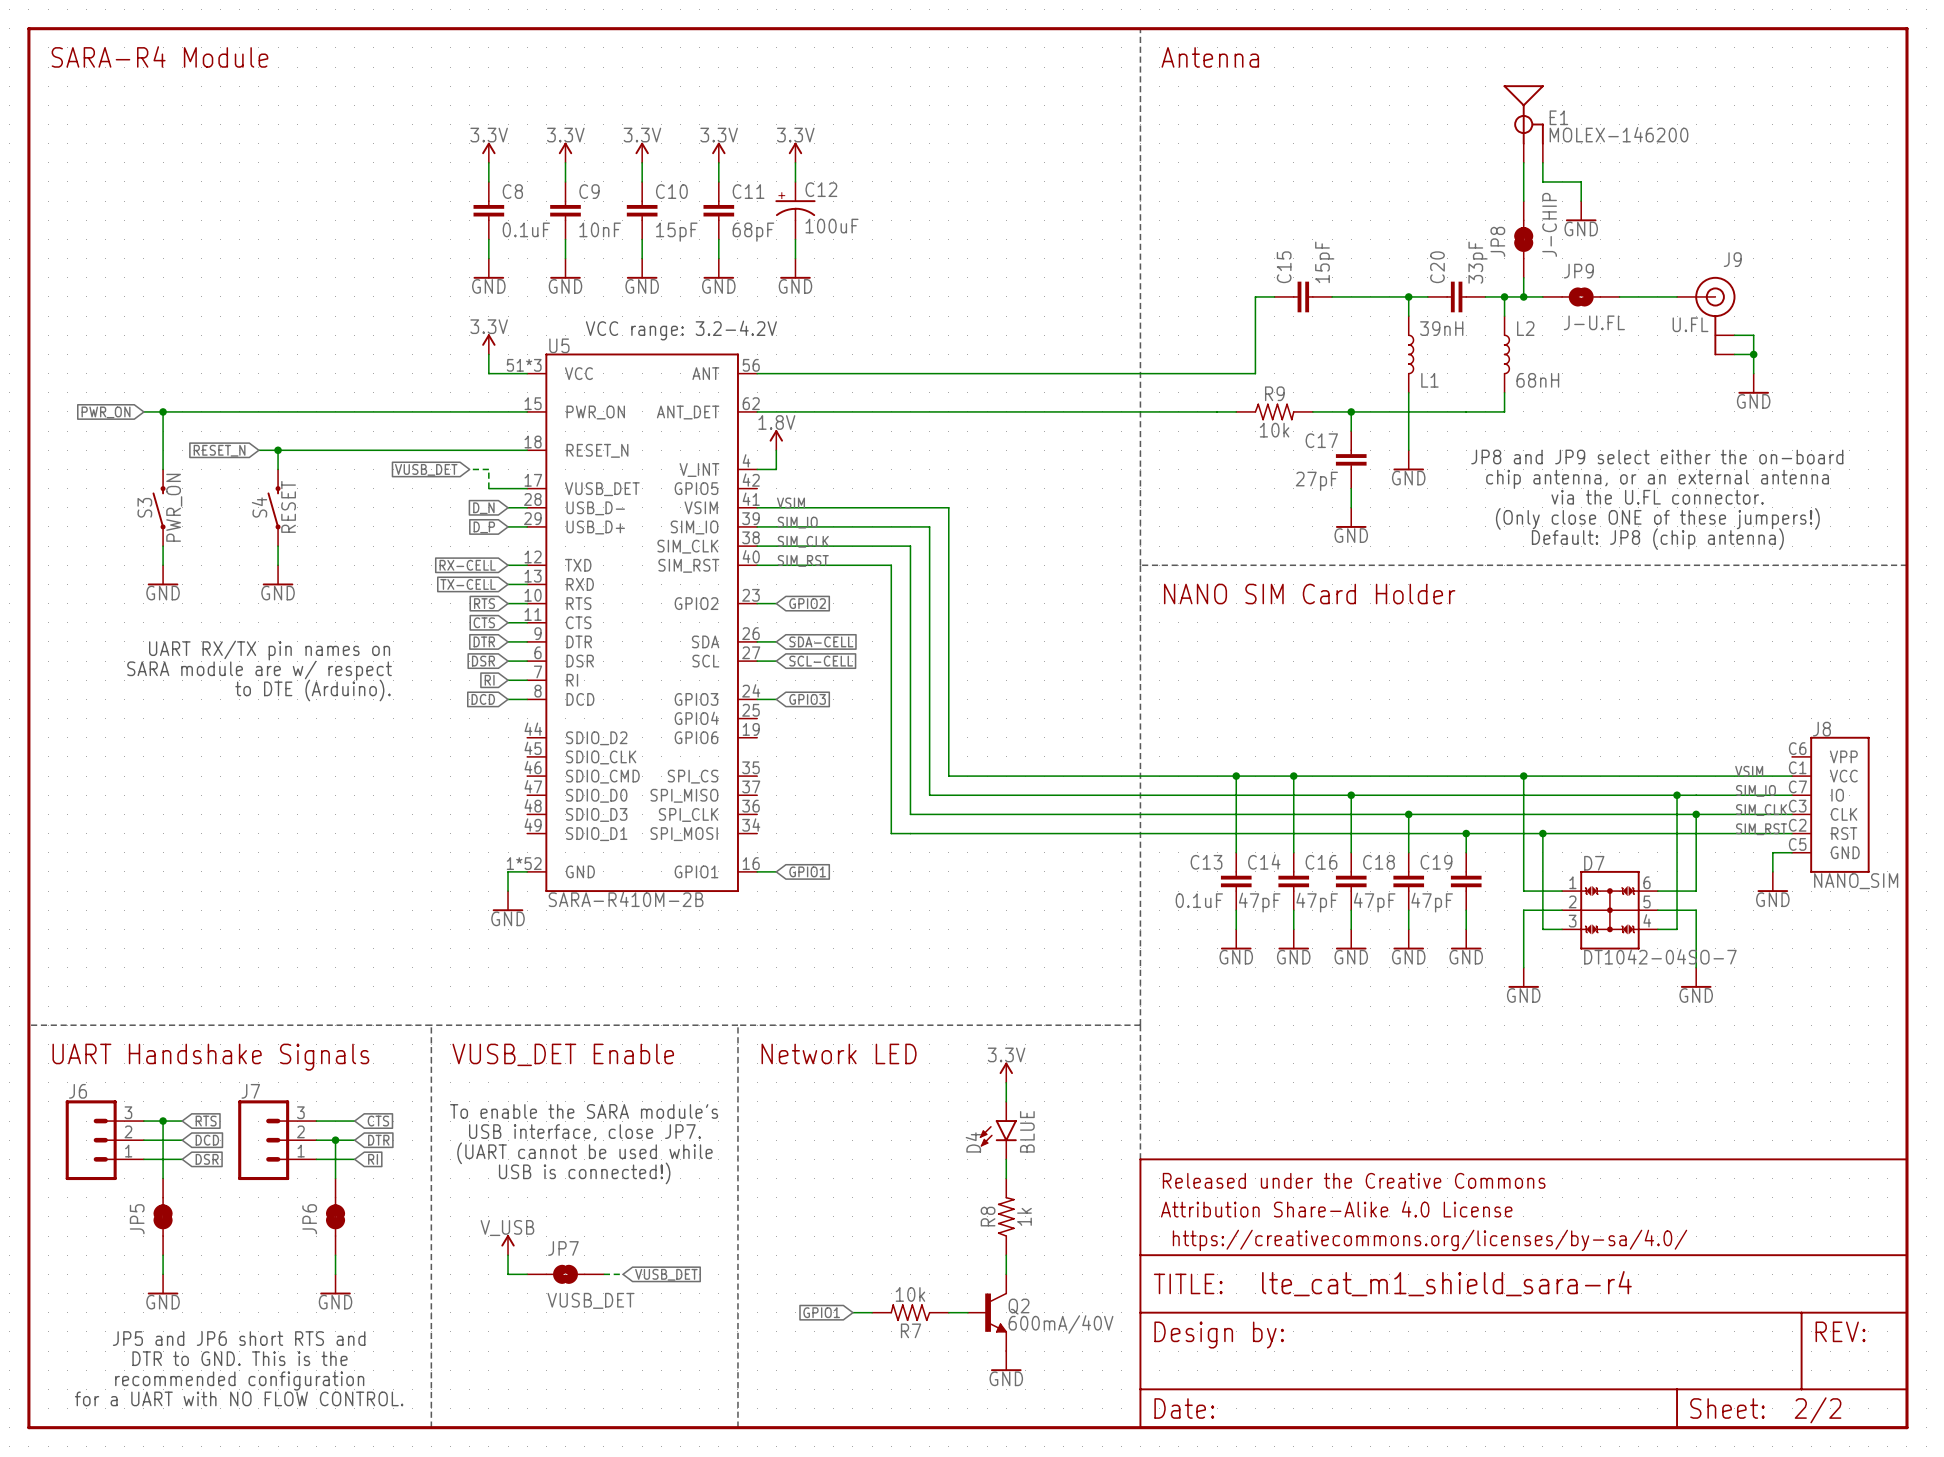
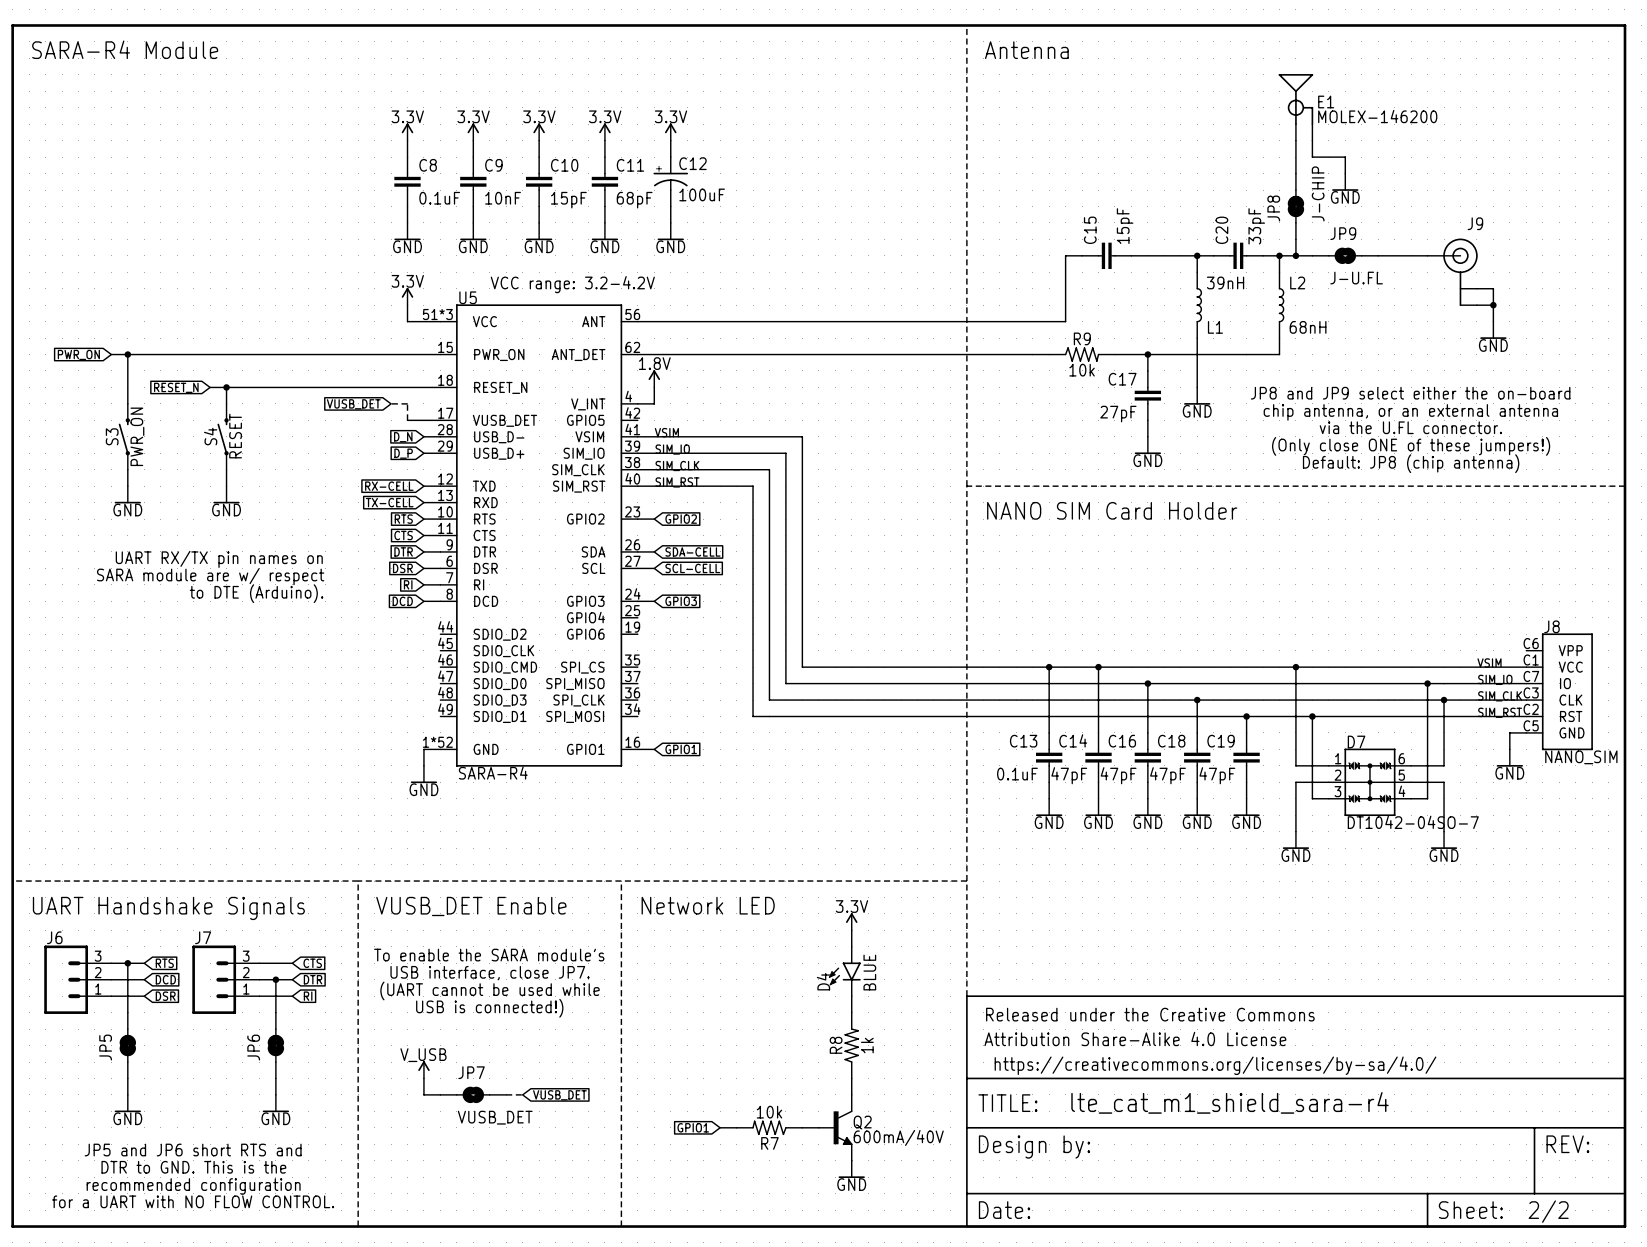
J9 value: U.FL (1690, 324) -> none
U5 value: SARA-R410M-2B (626, 899) -> SARA-R4 (493, 772)

